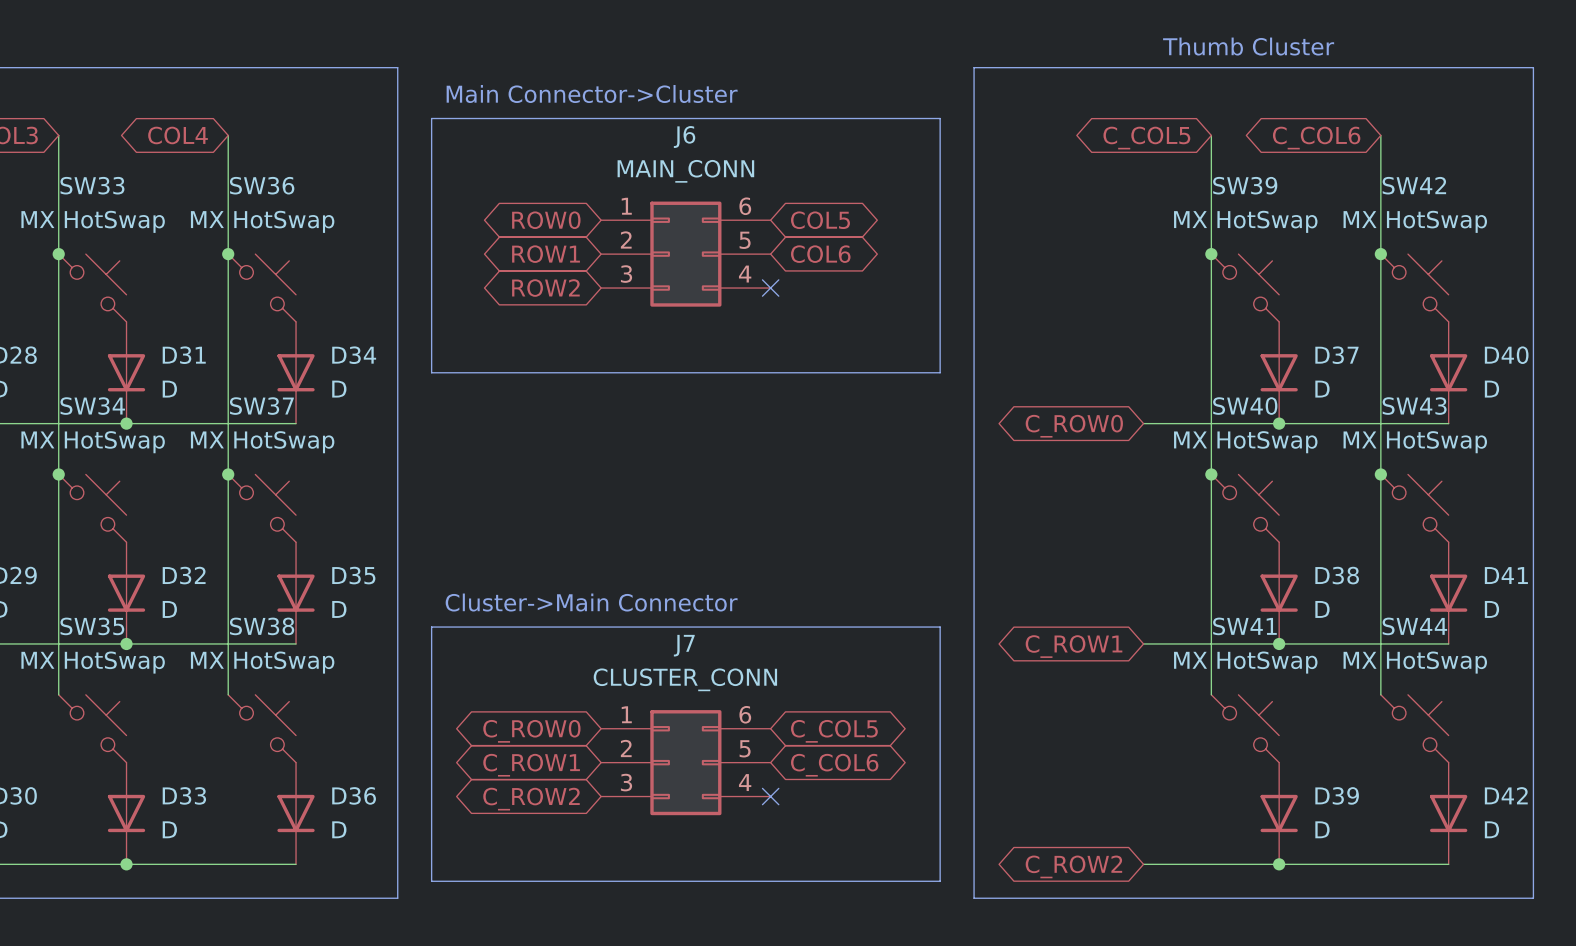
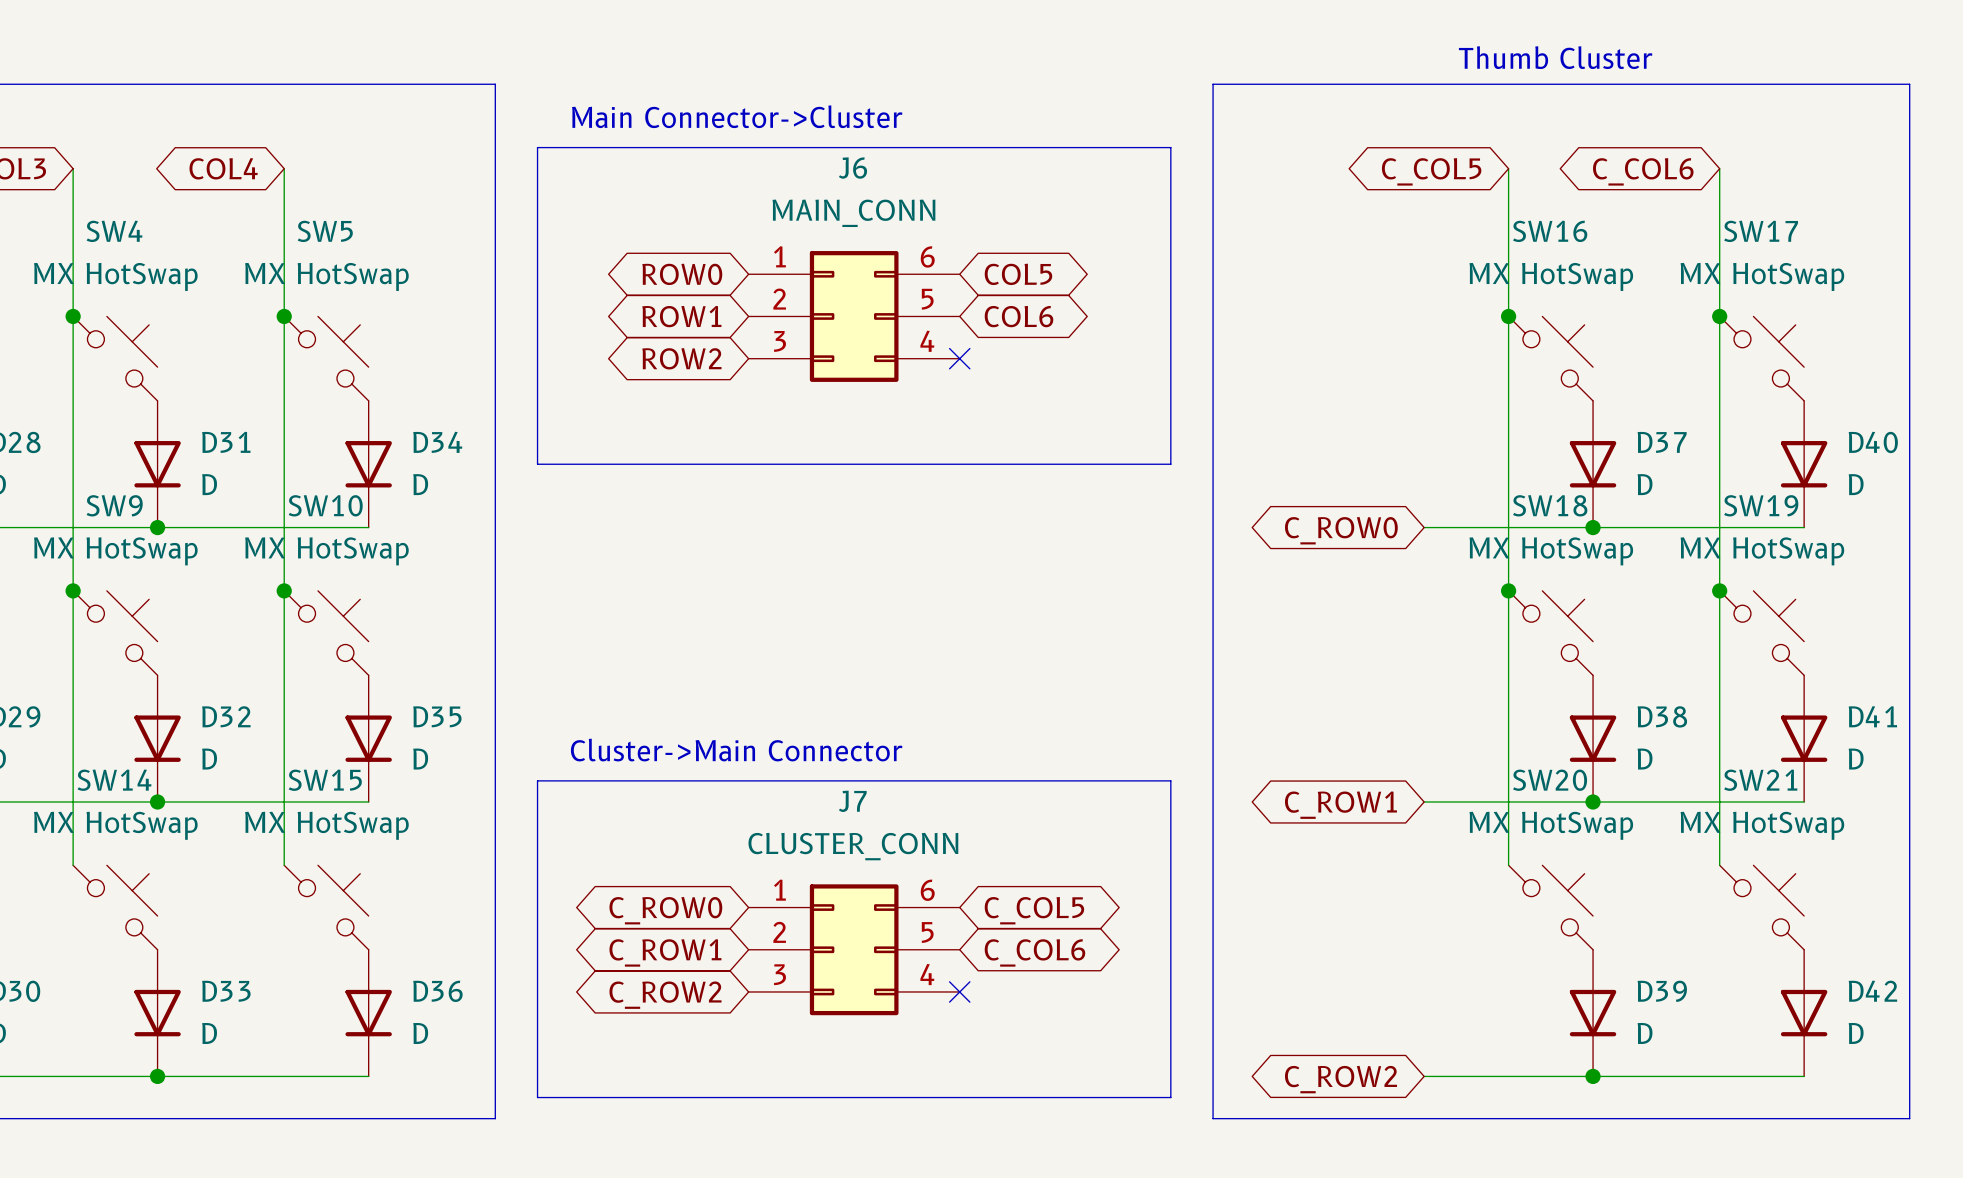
SW33 name: SW33 (92, 185) -> SW4 (114, 231)
SW36 name: SW36 (262, 185) -> SW5 (325, 231)
SW39 name: SW39 (1245, 185) -> SW16 (1550, 231)
SW42 name: SW42 (1414, 185) -> SW17 (1761, 231)
SW34 name: SW34 (92, 406) -> SW9 (114, 505)
SW37 name: SW37 (261, 406) -> SW10 (325, 505)
SW40 name: SW40 (1245, 406) -> SW18 (1550, 505)
SW43 name: SW43 (1414, 406) -> SW19 (1761, 505)
SW35 name: SW35 (92, 626) -> SW14 (114, 780)
SW38 name: SW38 (262, 626) -> SW15 (325, 780)
SW41 name: SW41 (1244, 626) -> SW20 (1550, 780)
SW44 name: SW44 (1414, 626) -> SW21 (1760, 780)

